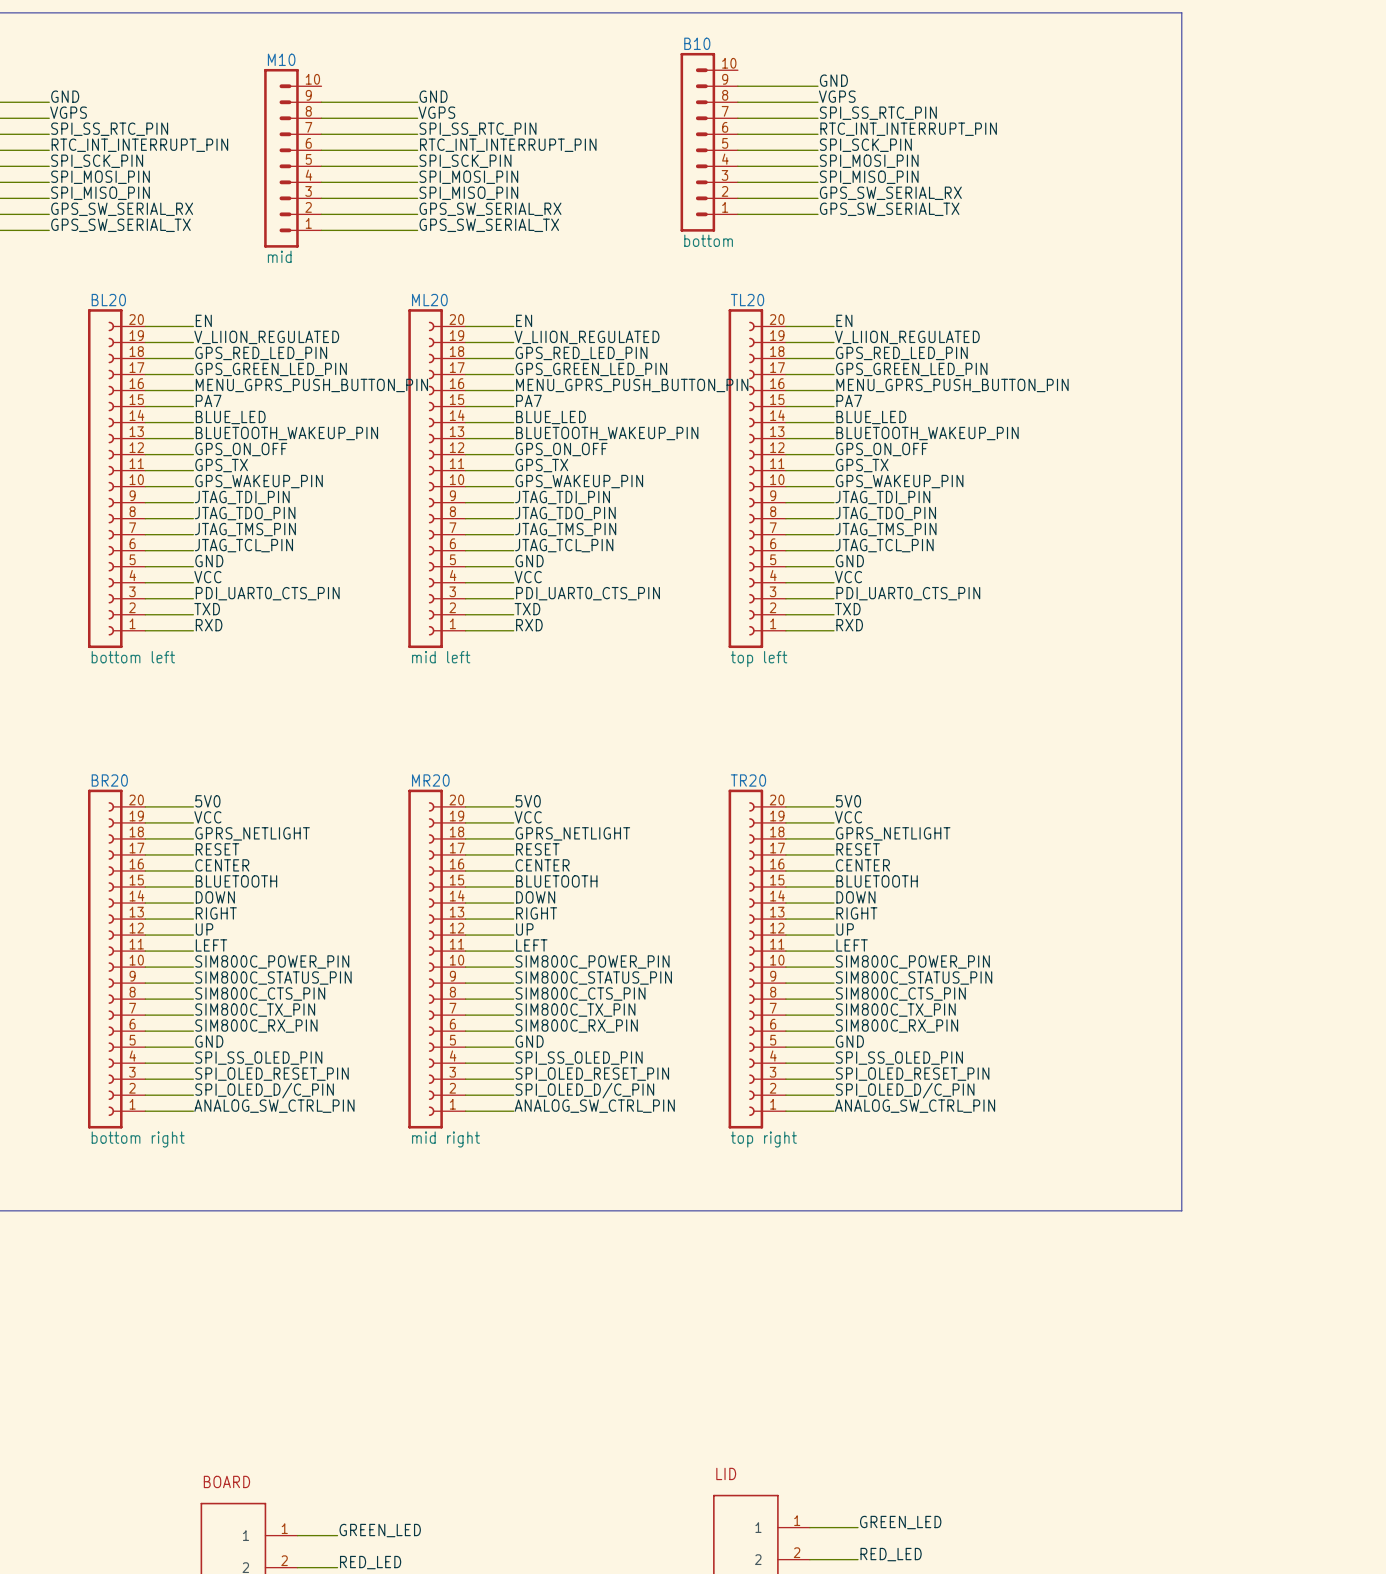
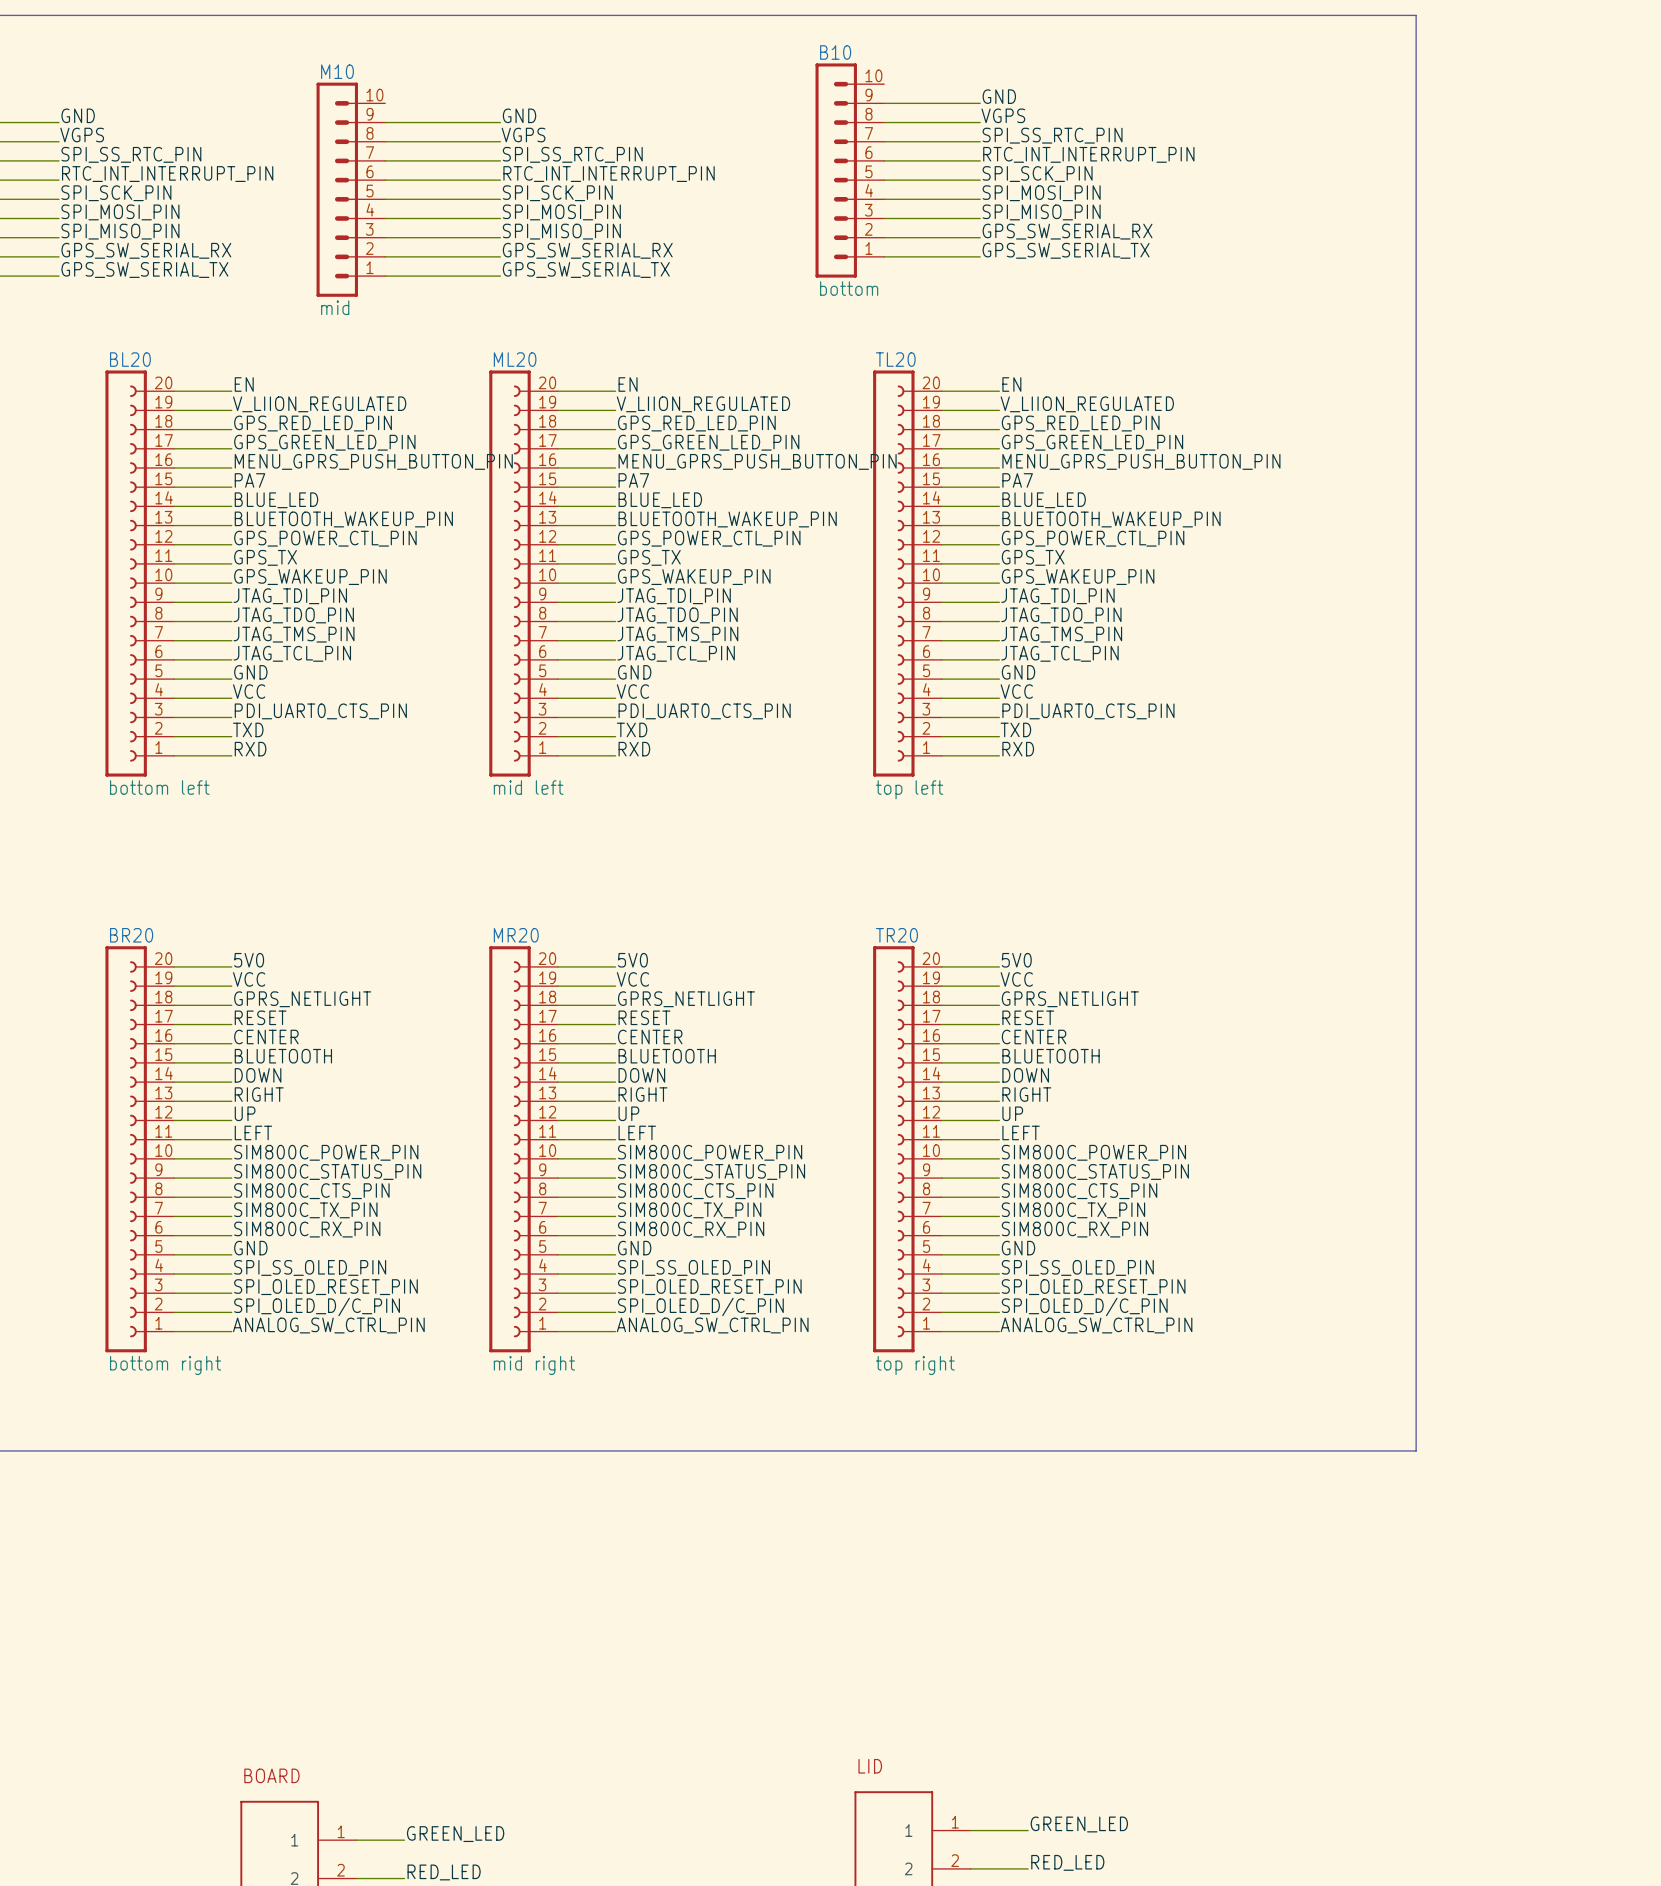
label: GPS_ON_OFF (241, 449) -> GPS_POWER_CTL_PIN (325, 538)
label: GPS_ON_OFF (561, 449) -> GPS_POWER_CTL_PIN (709, 538)
label: GPS_ON_OFF (881, 449) -> GPS_POWER_CTL_PIN (1093, 538)

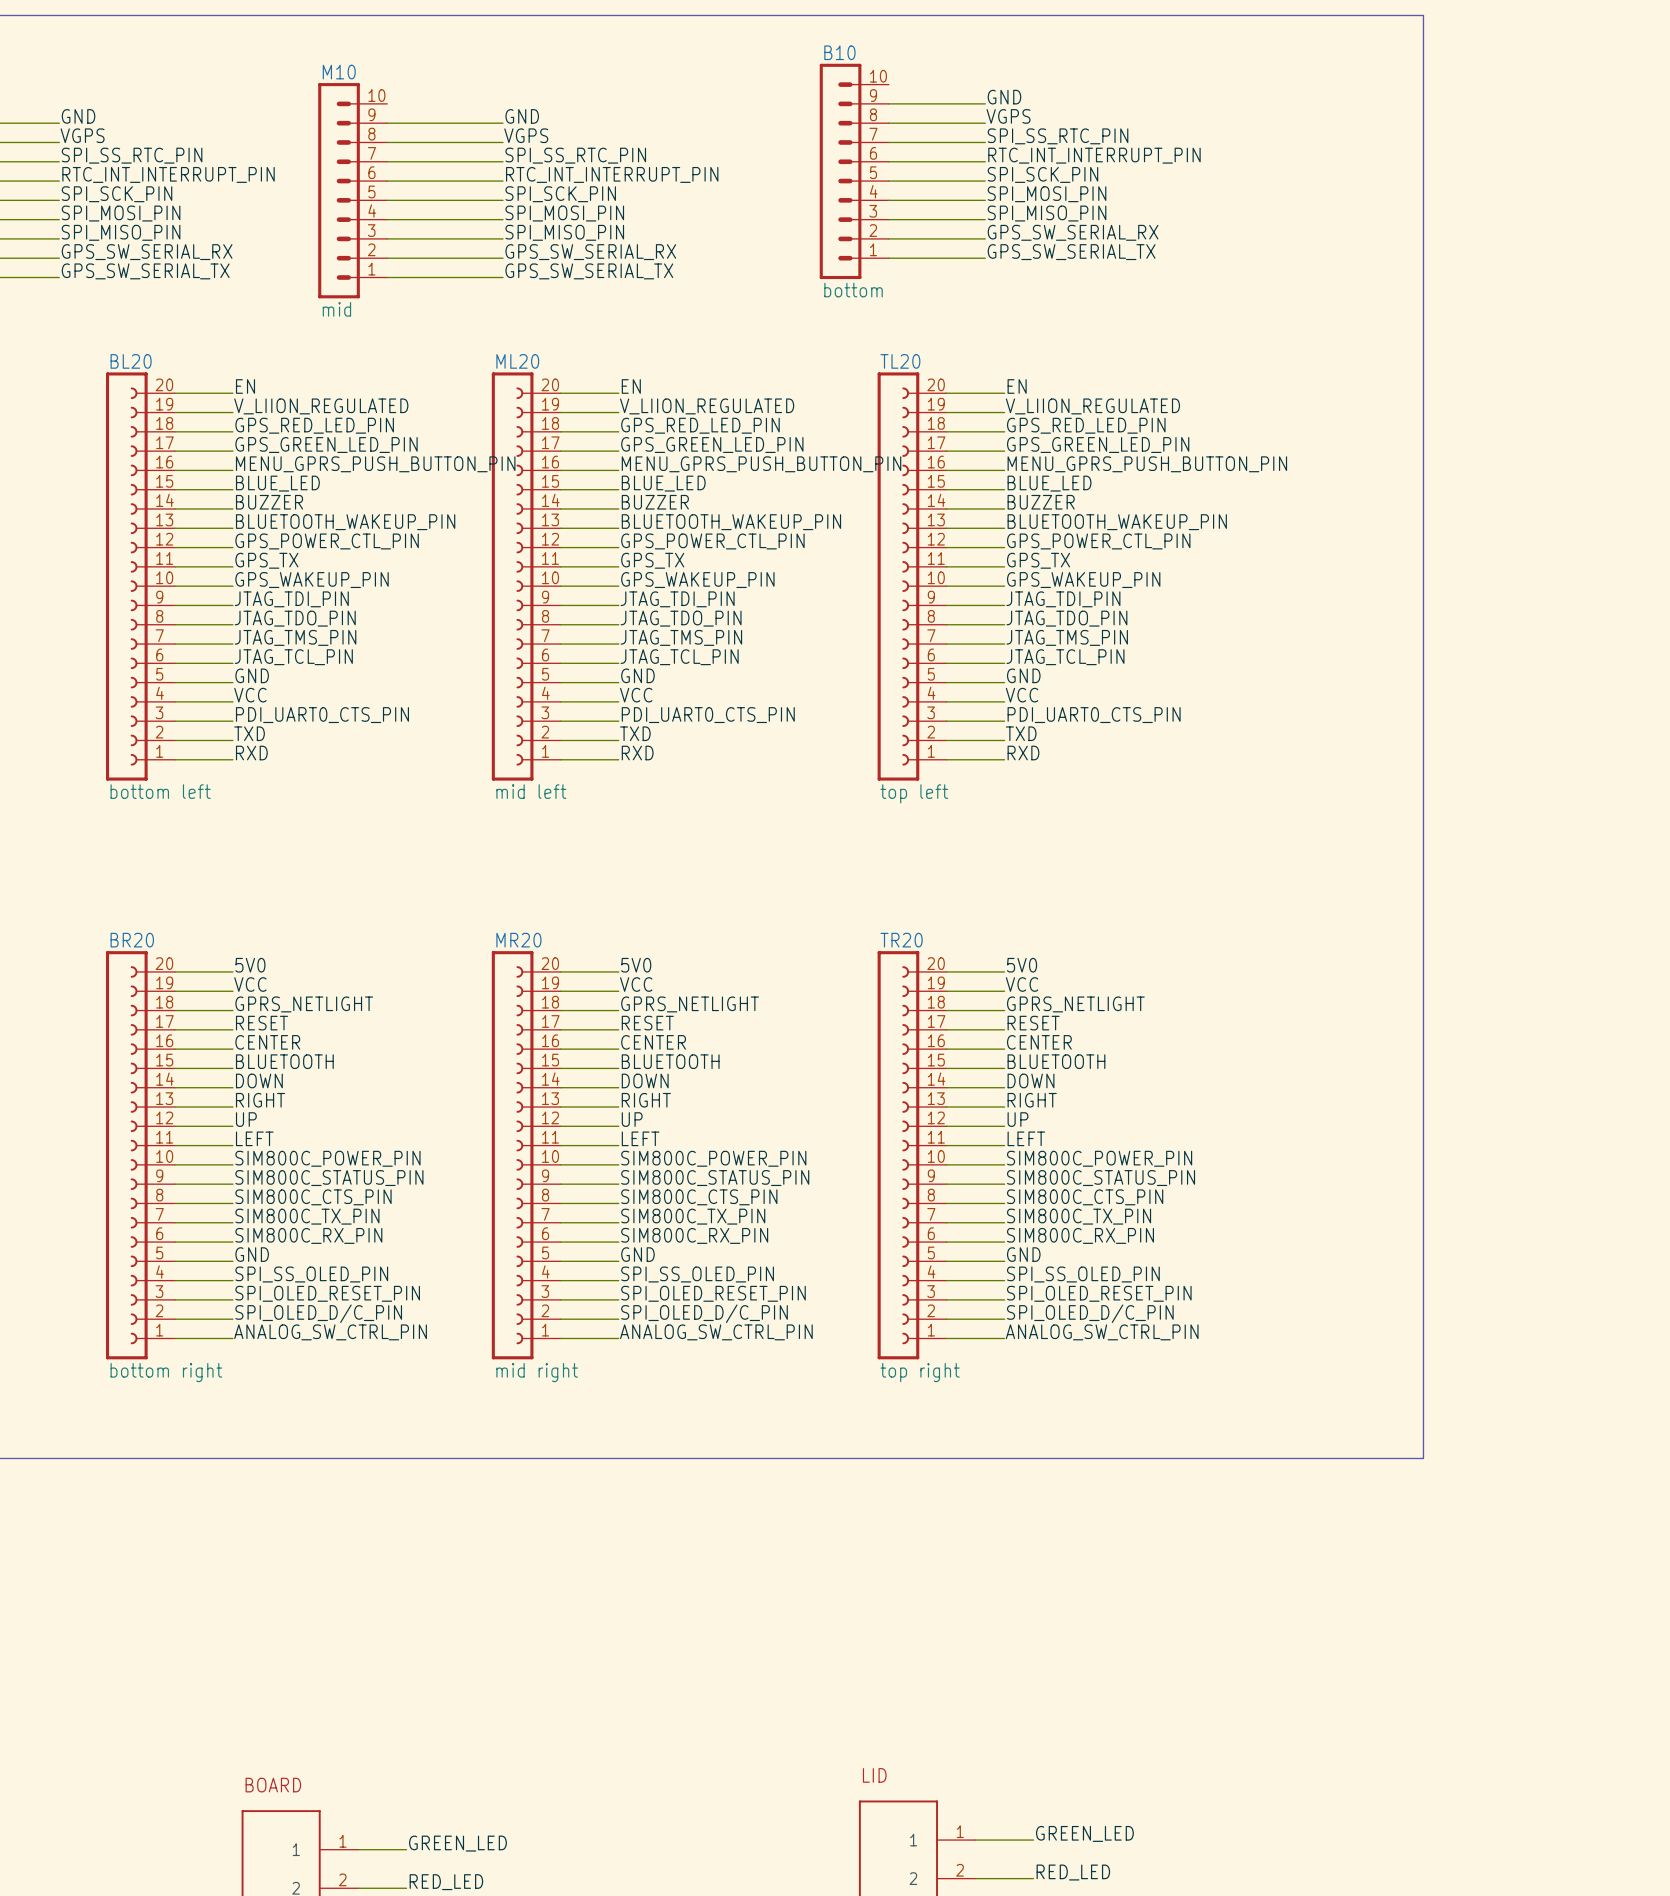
label: PA7 (249, 480) -> BLUE_LED (277, 483)
label: PA7 (633, 480) -> BLUE_LED (663, 483)
label: PA7 (1017, 480) -> BLUE_LED (1049, 483)
label: BLUE_LED (276, 500) -> BUZZER (269, 502)
label: BLUE_LED (660, 500) -> BUZZER (655, 502)
label: BLUE_LED (1044, 500) -> BUZZER (1041, 502)

